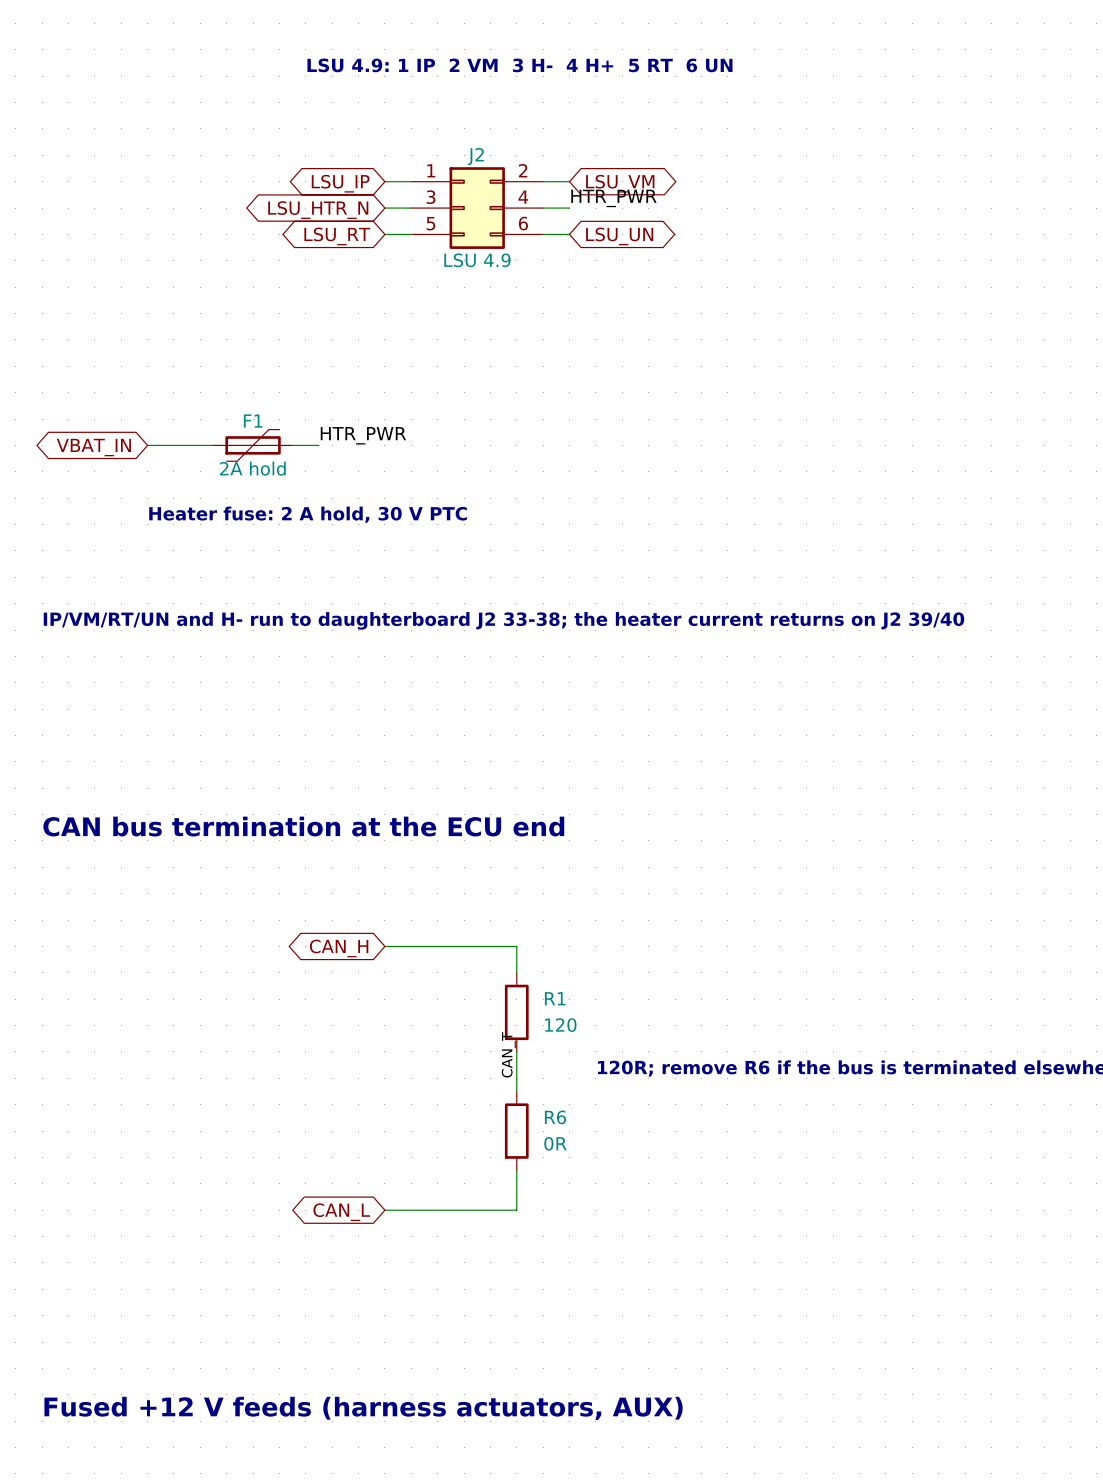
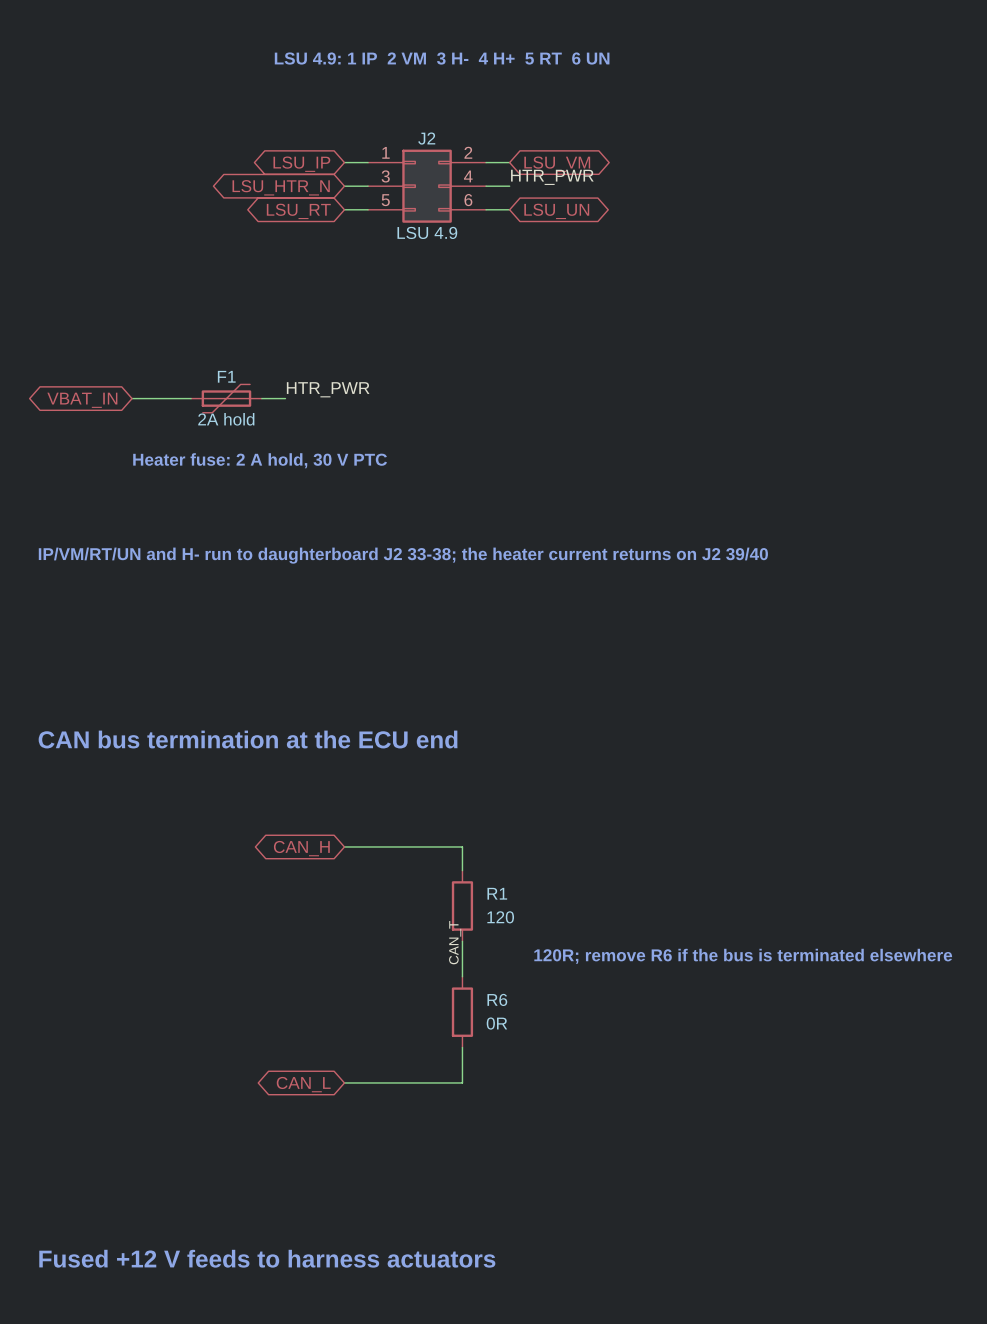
text: Fused +12 V feeds (harness actuators, AUX) (363, 1408) -> Fused +12 V feeds to harness actuators (267, 1258)

